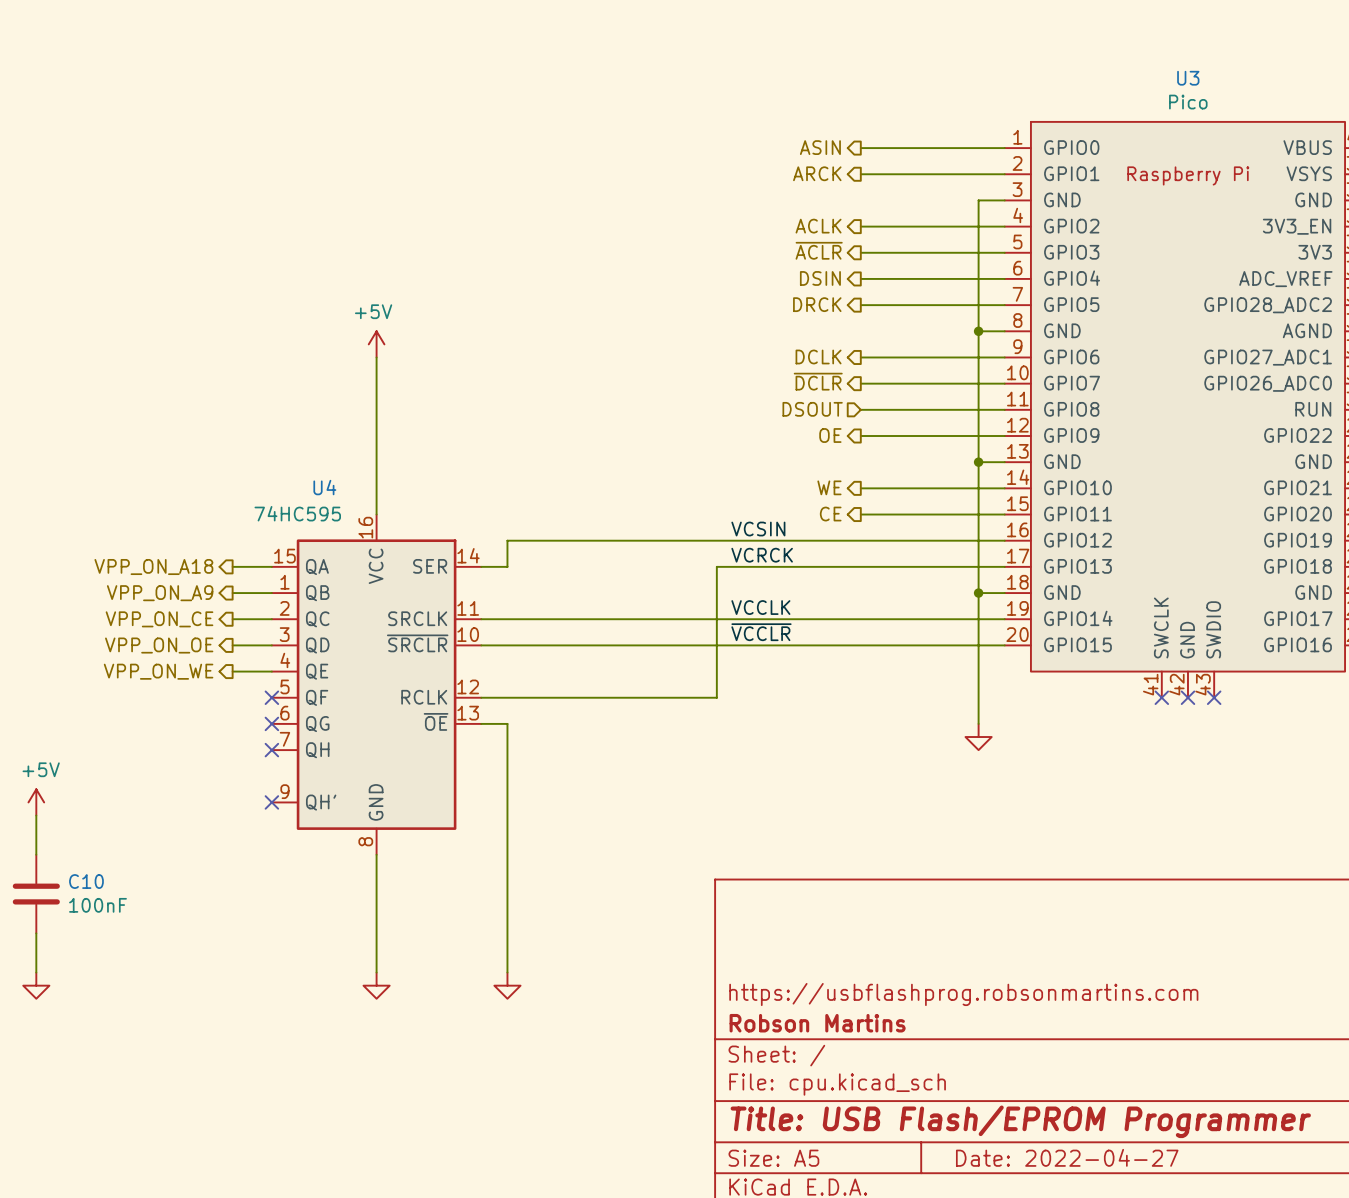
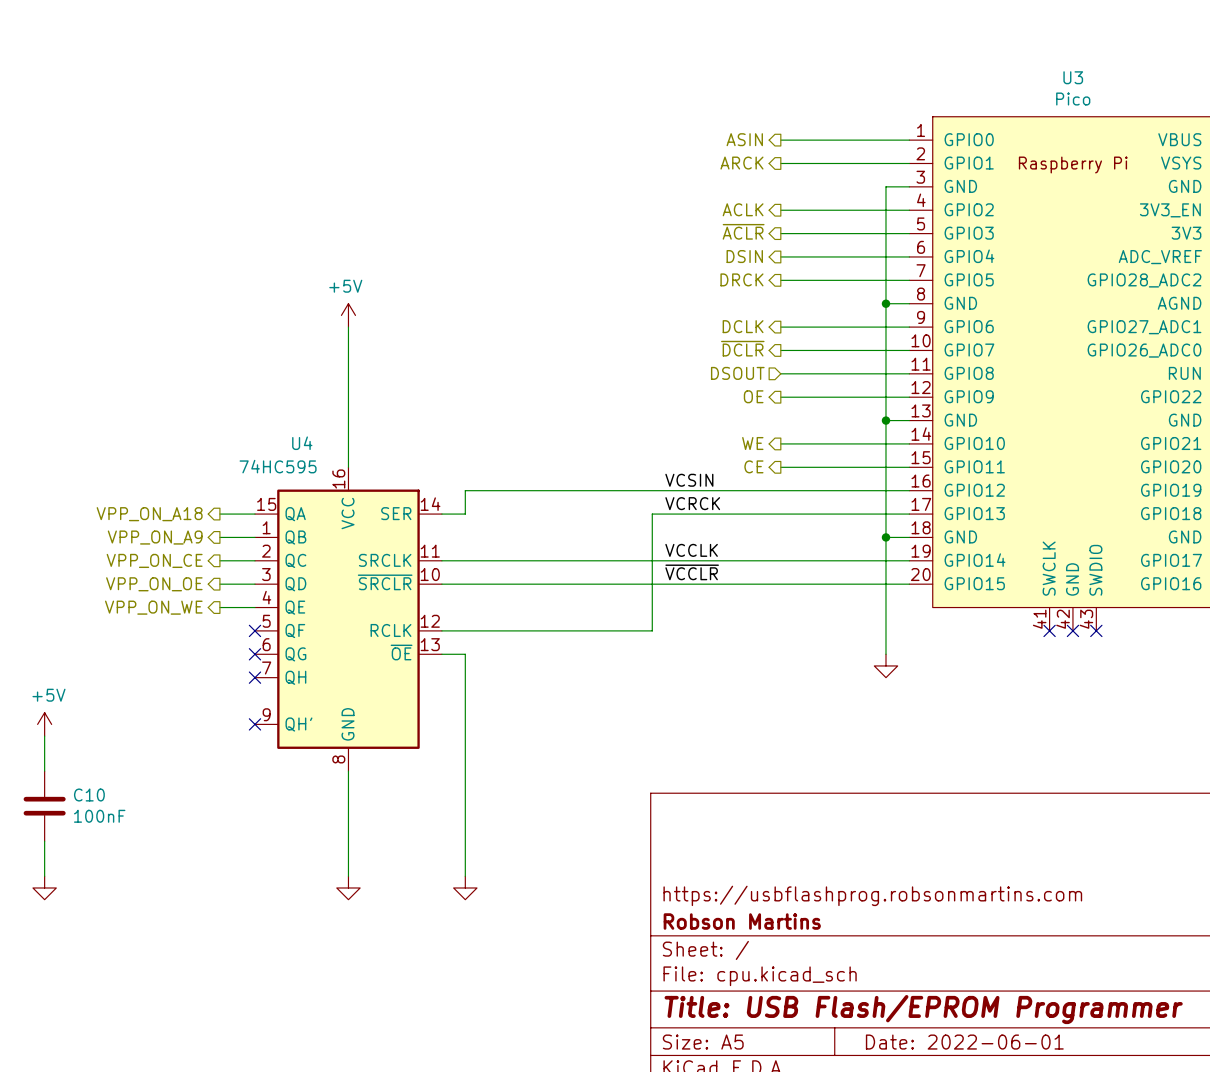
title block: Date: 2022-04-27 (1067, 1157) -> Date: 2022-06-01 (964, 1042)

